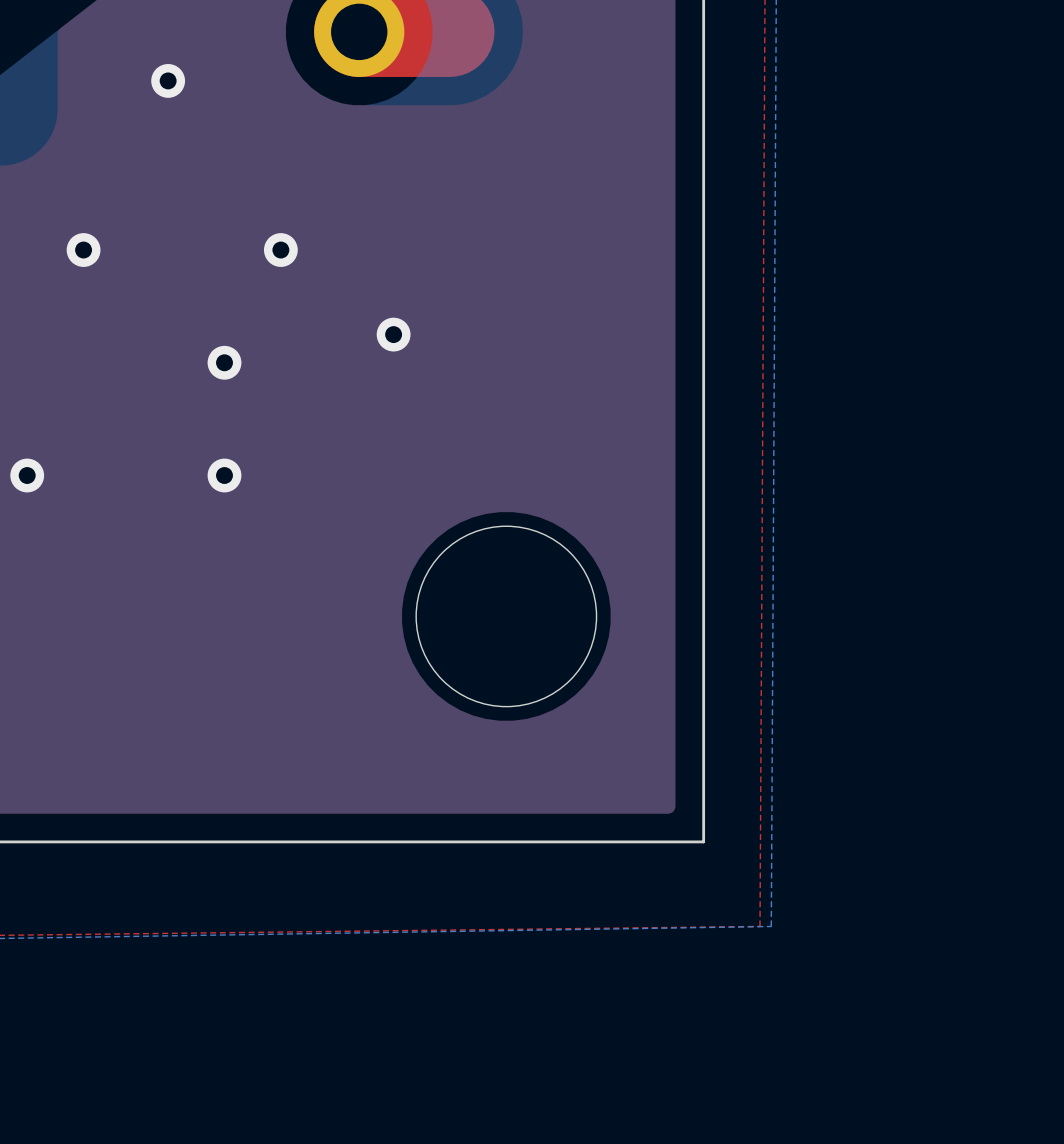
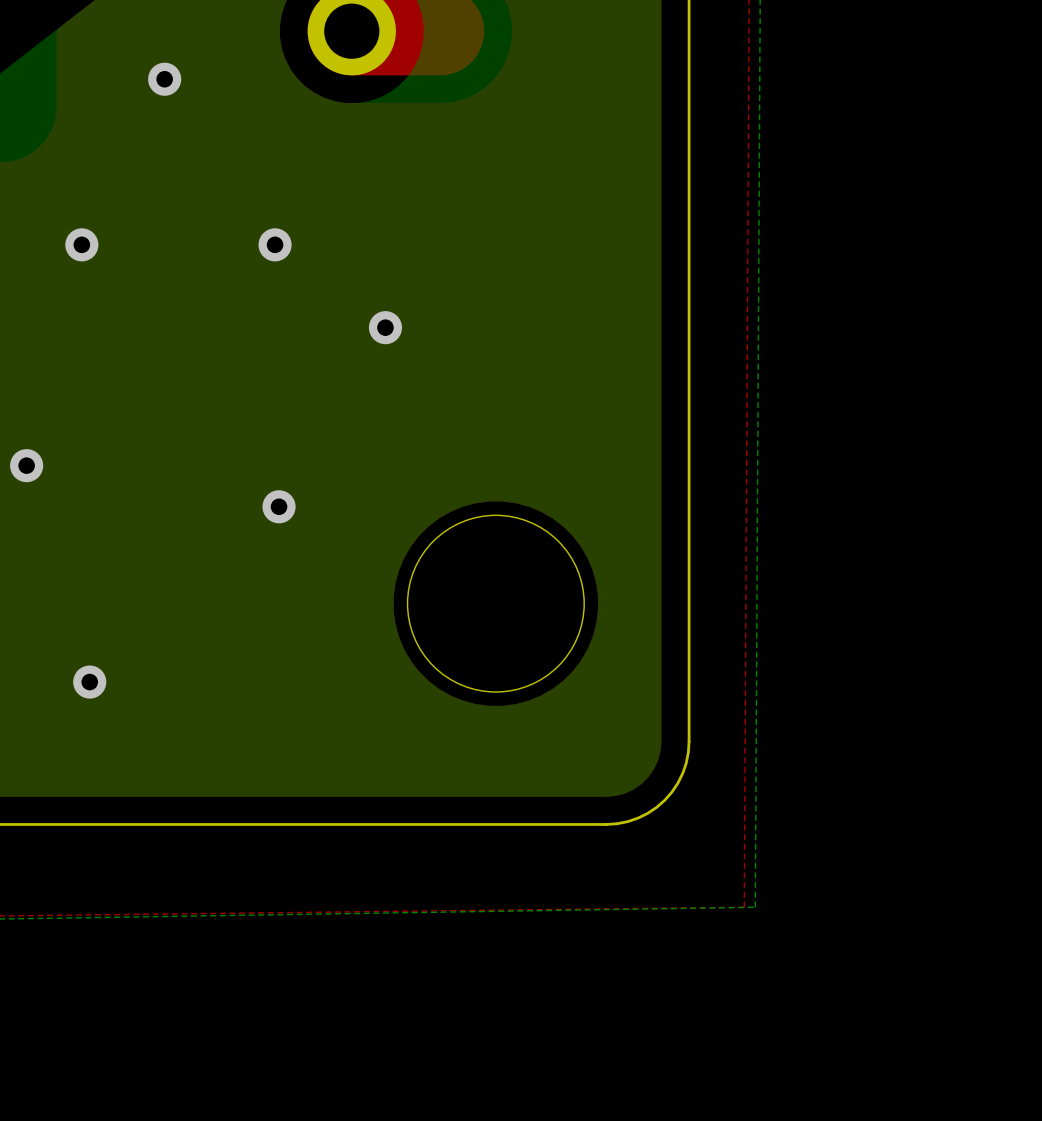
via: (224, 362) -> none
via position: (224, 475) -> (279, 506)
via: none -> (89, 682)
board edge: (703, 757) (703, 841) (619, 841) -> (689, 741) (682, 773) (664, 800) (637, 818) (606, 824)

